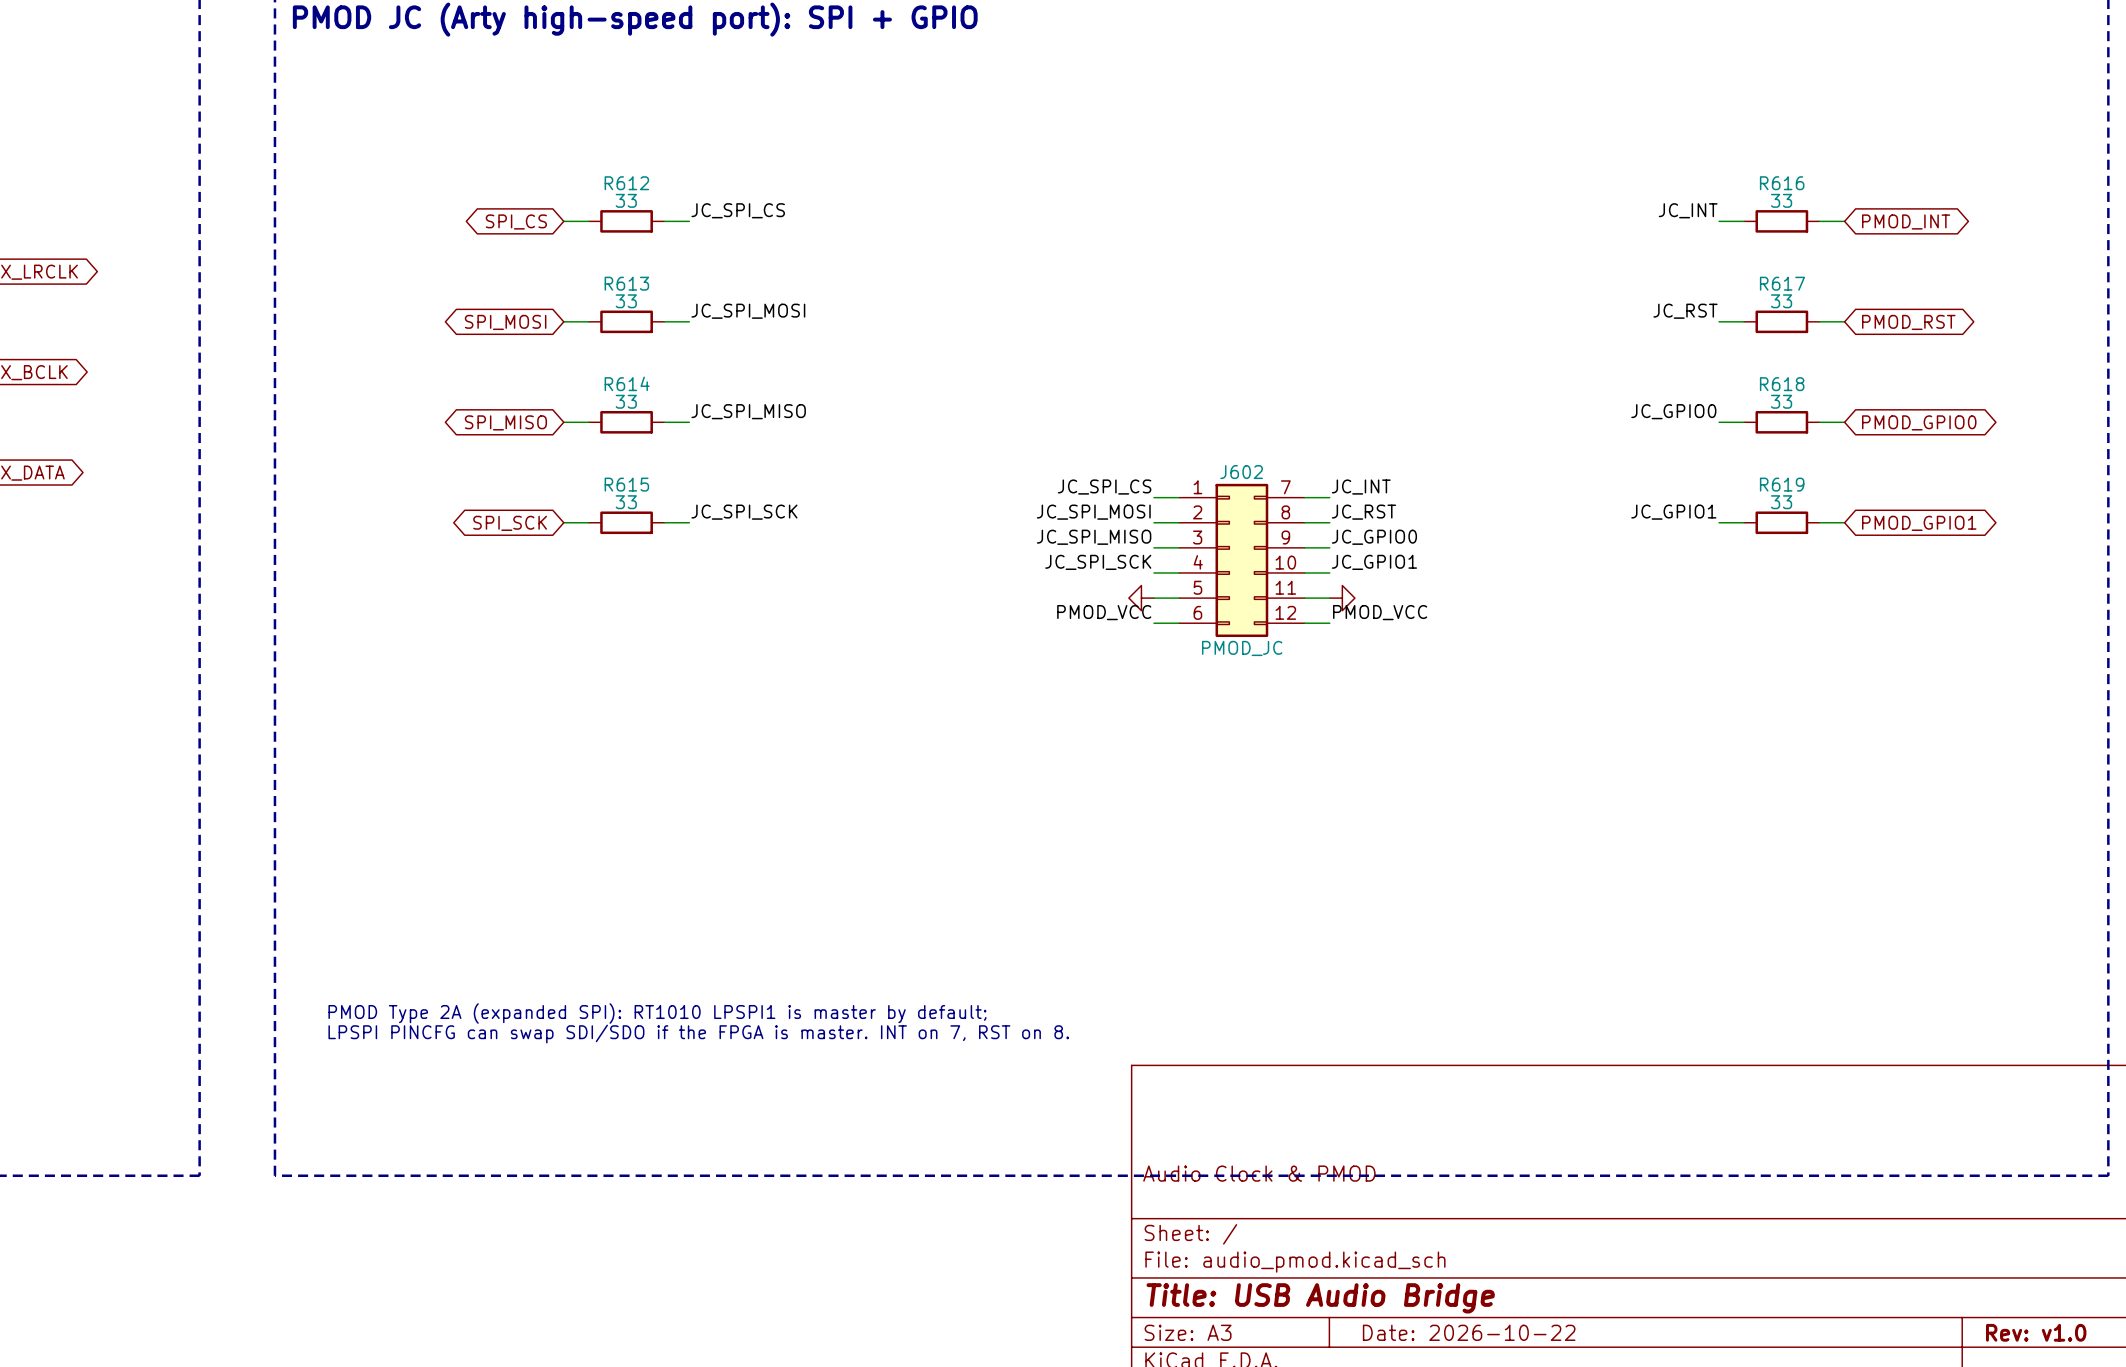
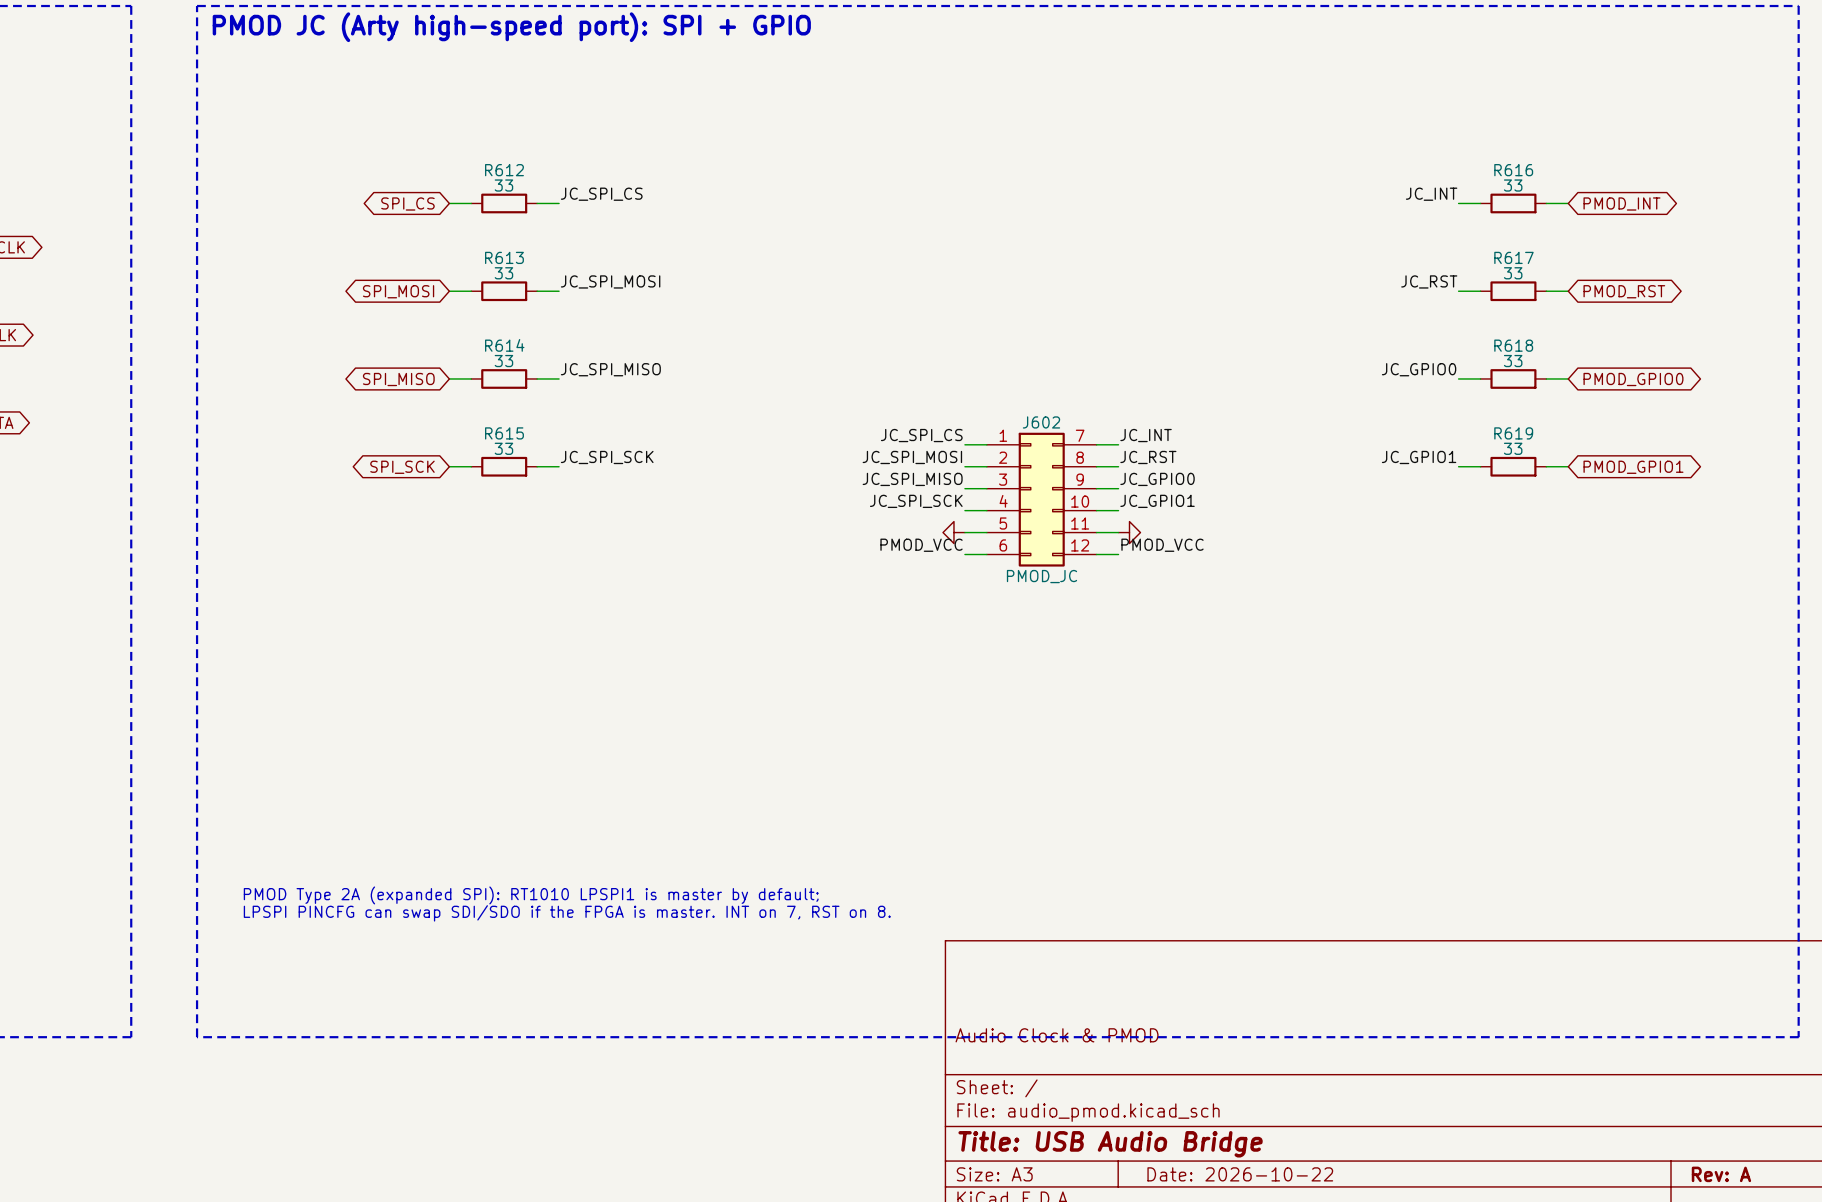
title block: Rev: v1.0 (2036, 1332) -> Rev: A (1721, 1174)

